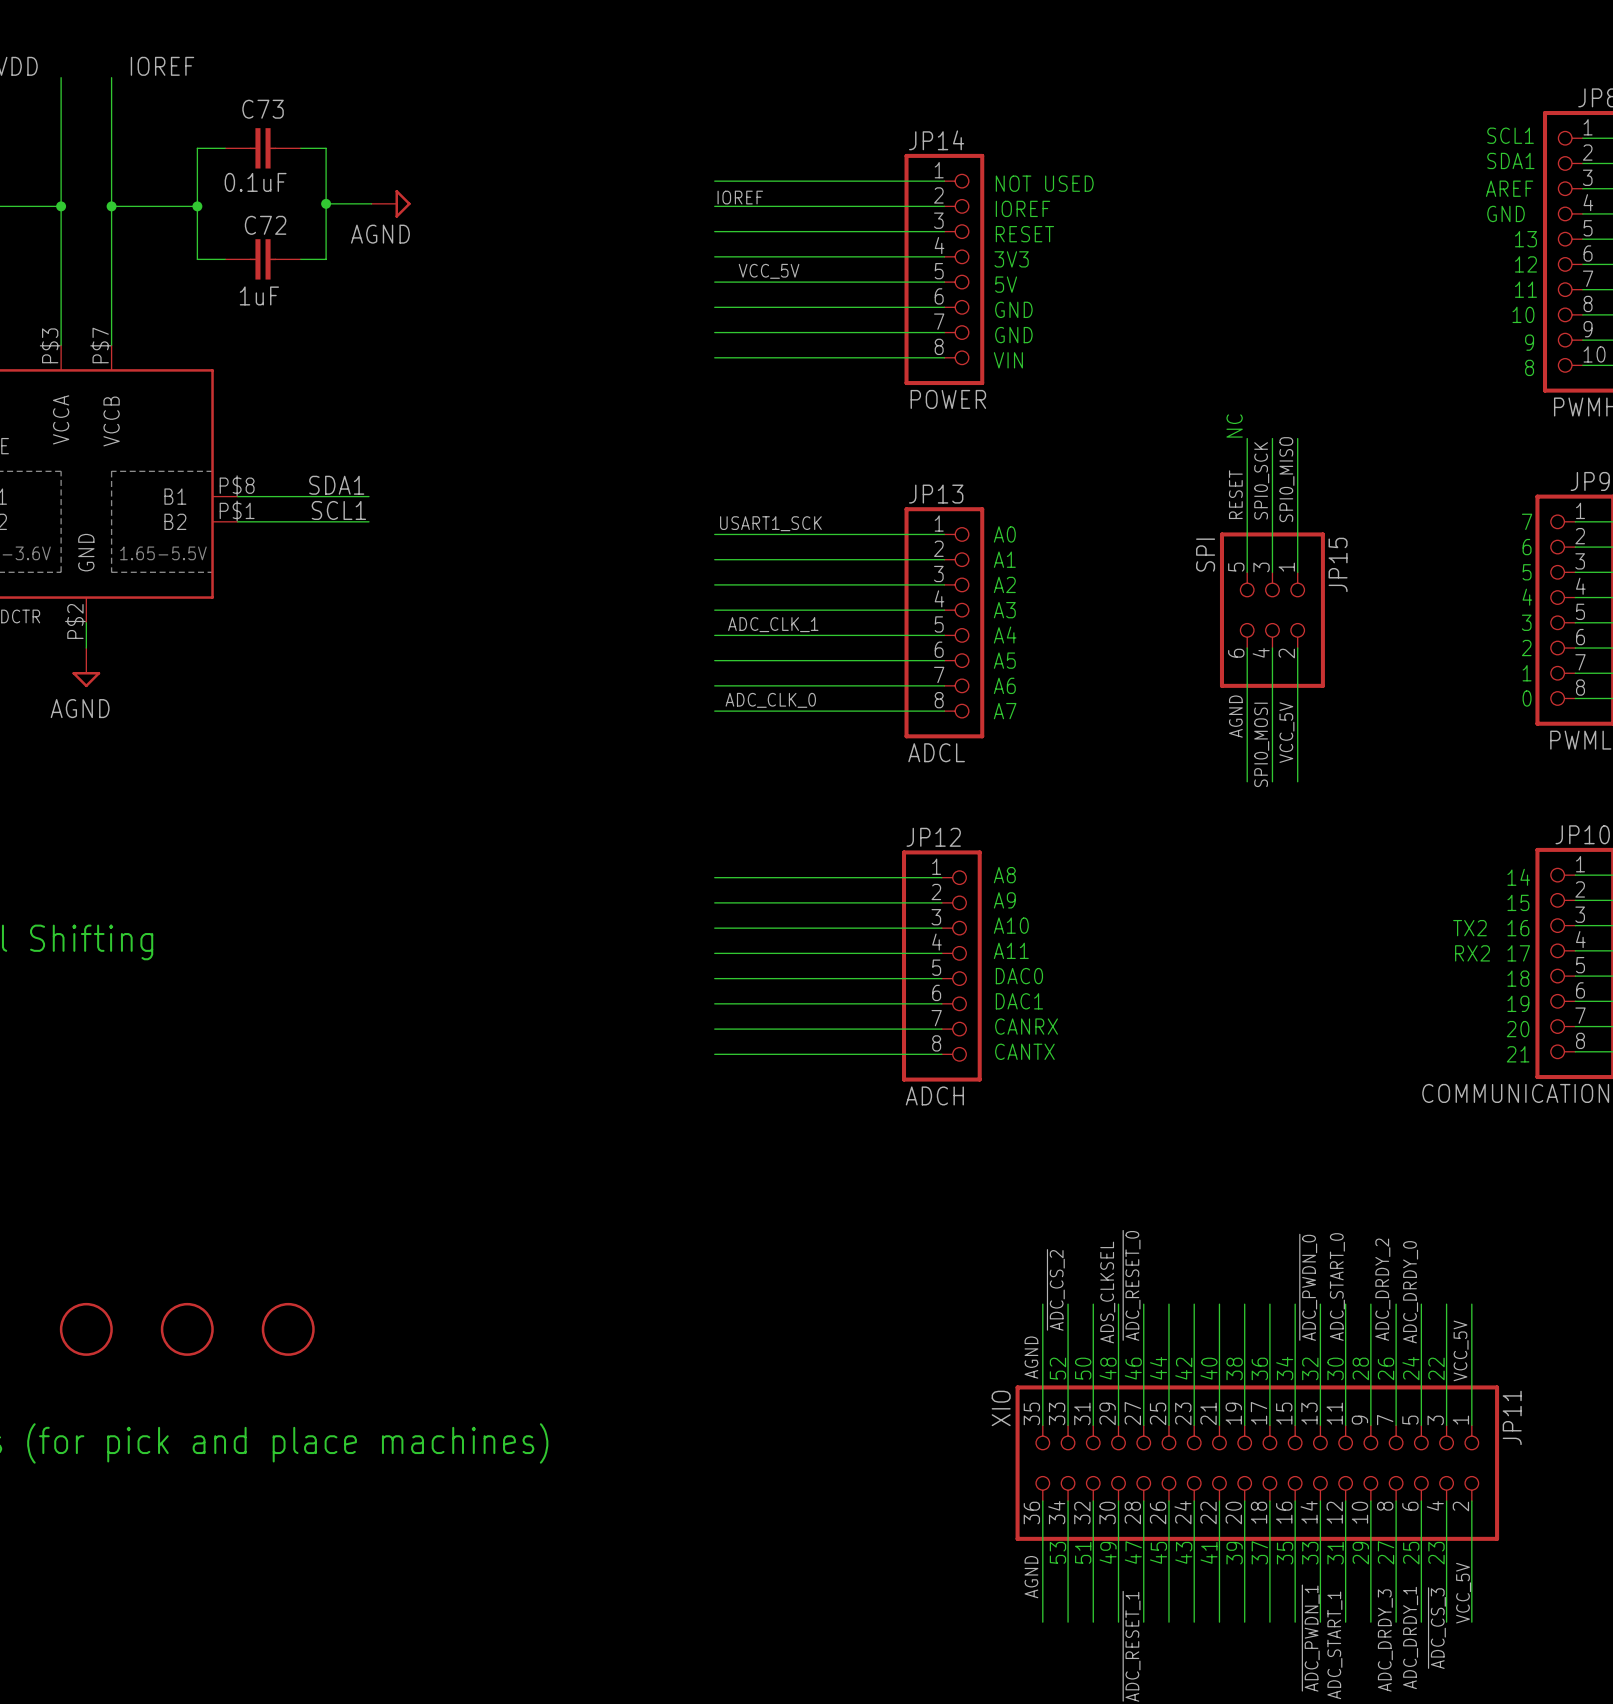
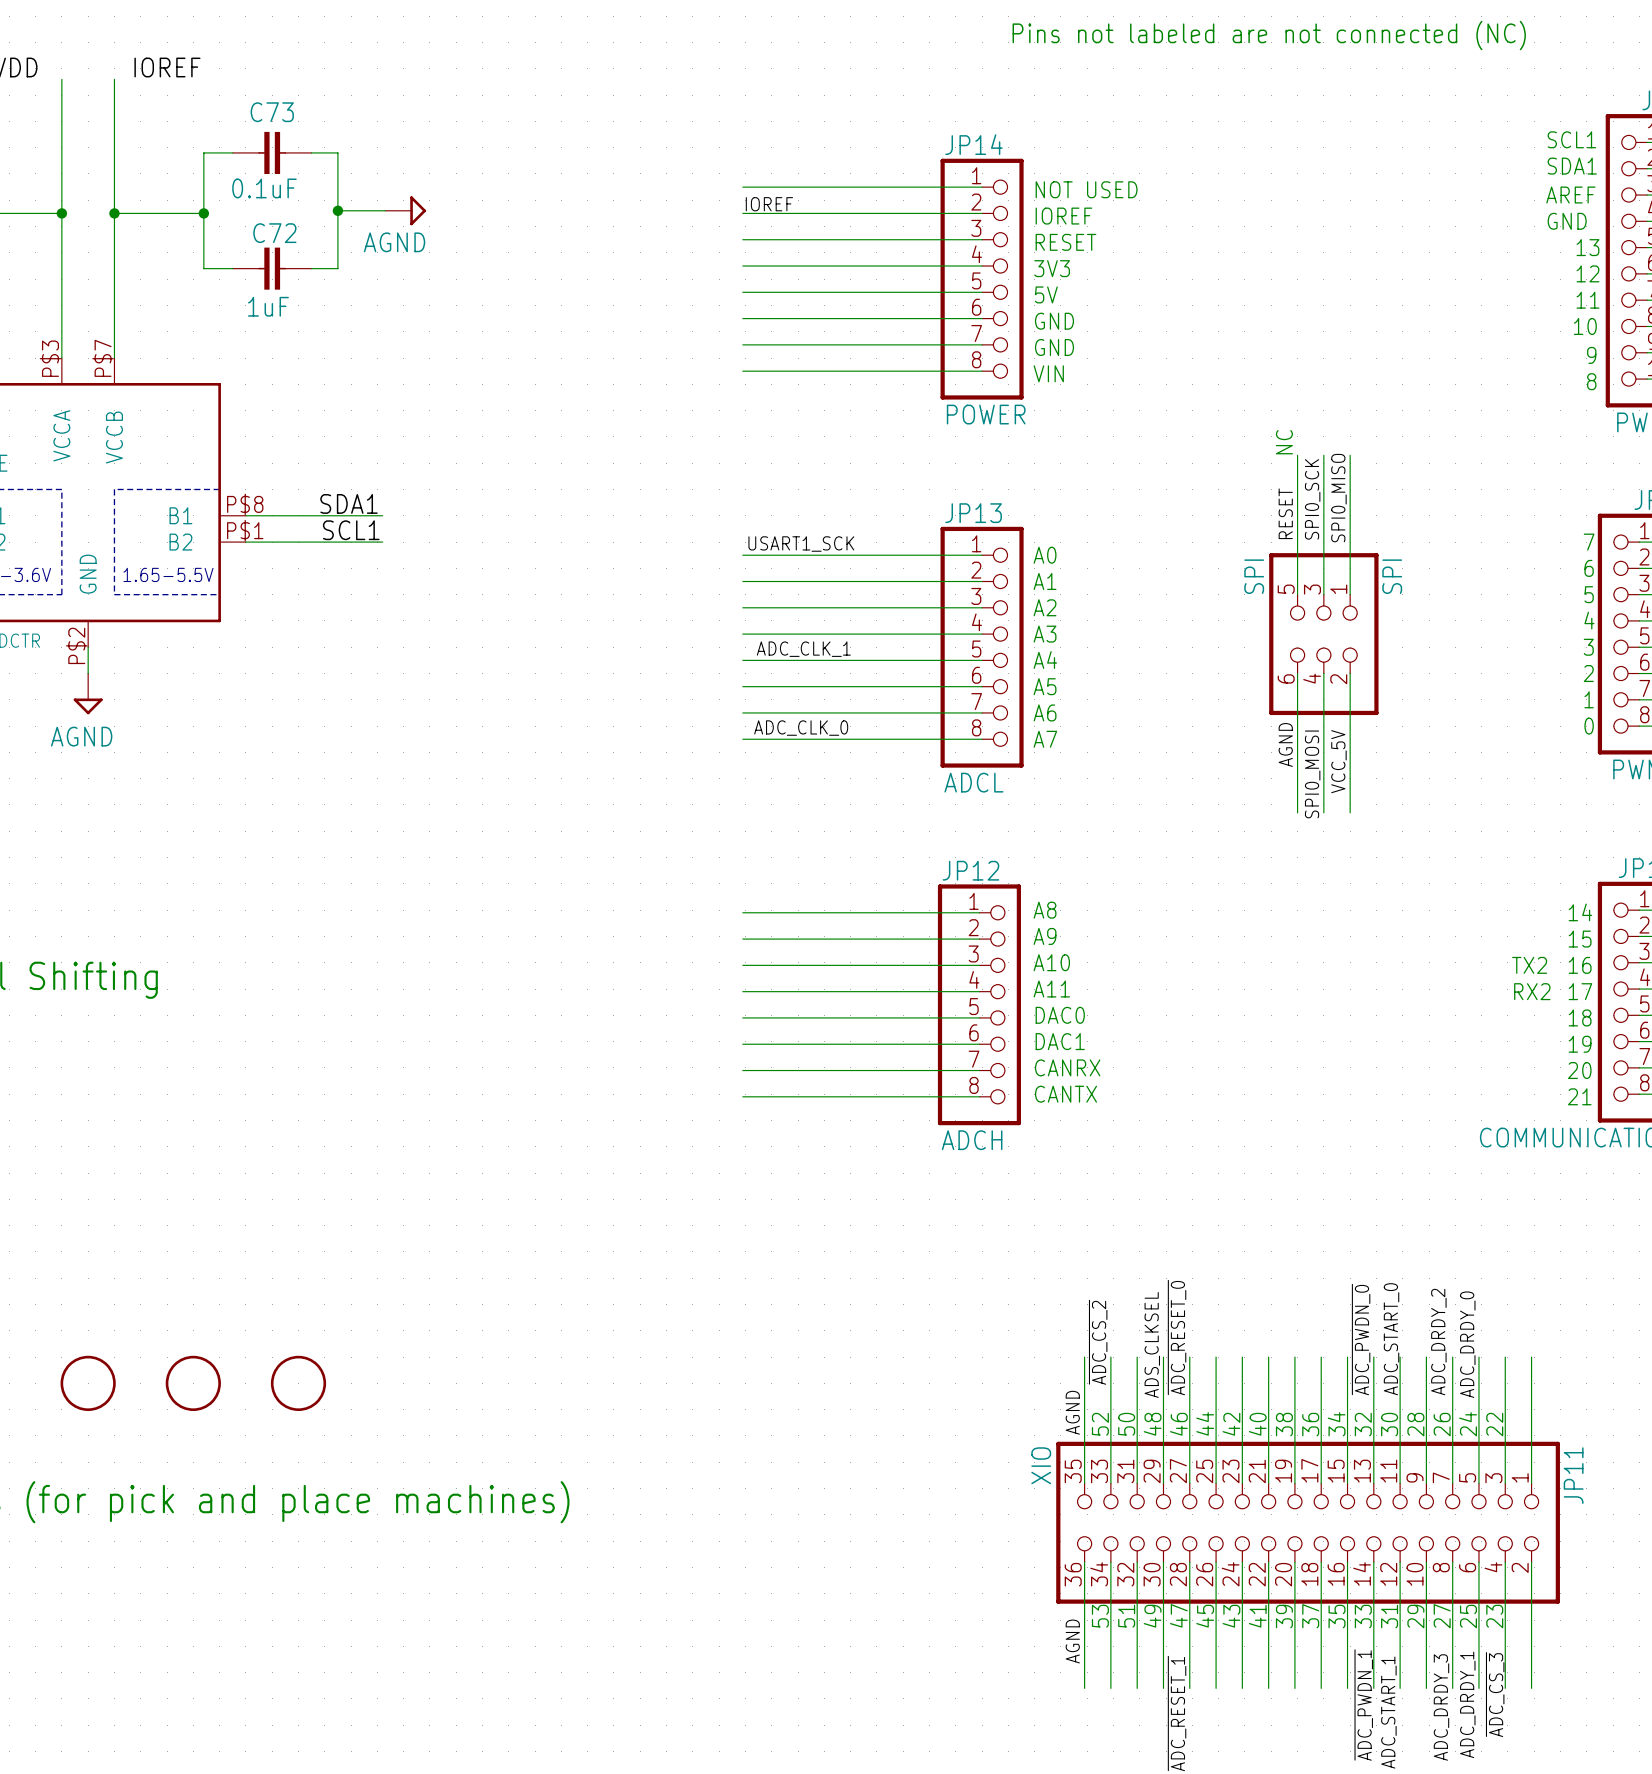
text: none -> Pins not labeled are not connected (NC) (1269, 35)
label: VCC_5V (769, 271) -> none
JP15 name: JP15 (1338, 564) -> SPI (1392, 576)
label: VCC_5V (1461, 1350) -> none
label: VCC_5V (1463, 1593) -> none

